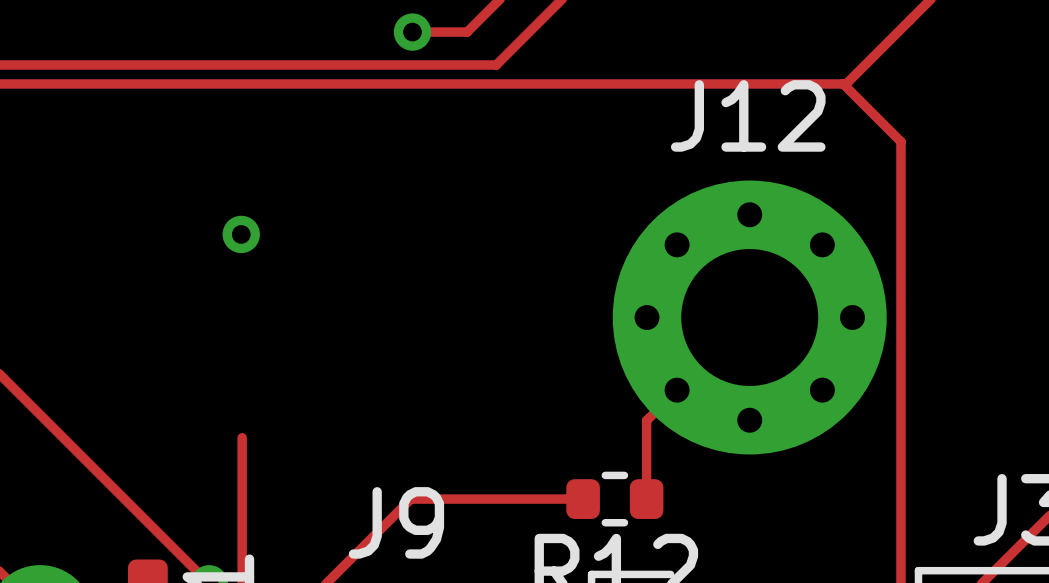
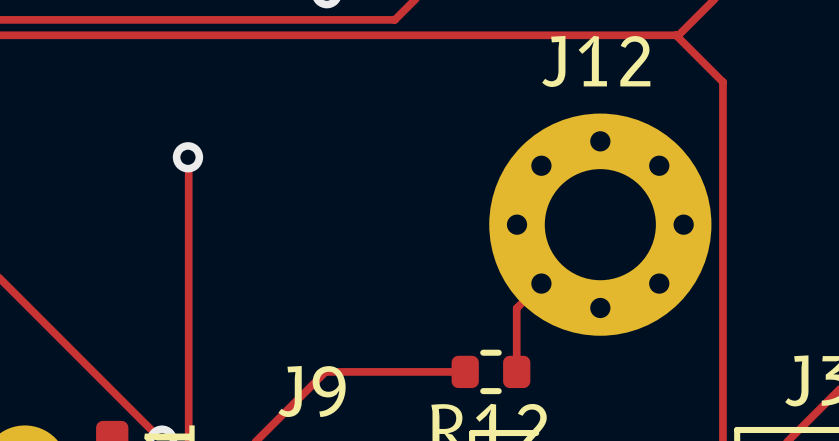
track: none -> (187, 157) (188, 322)

